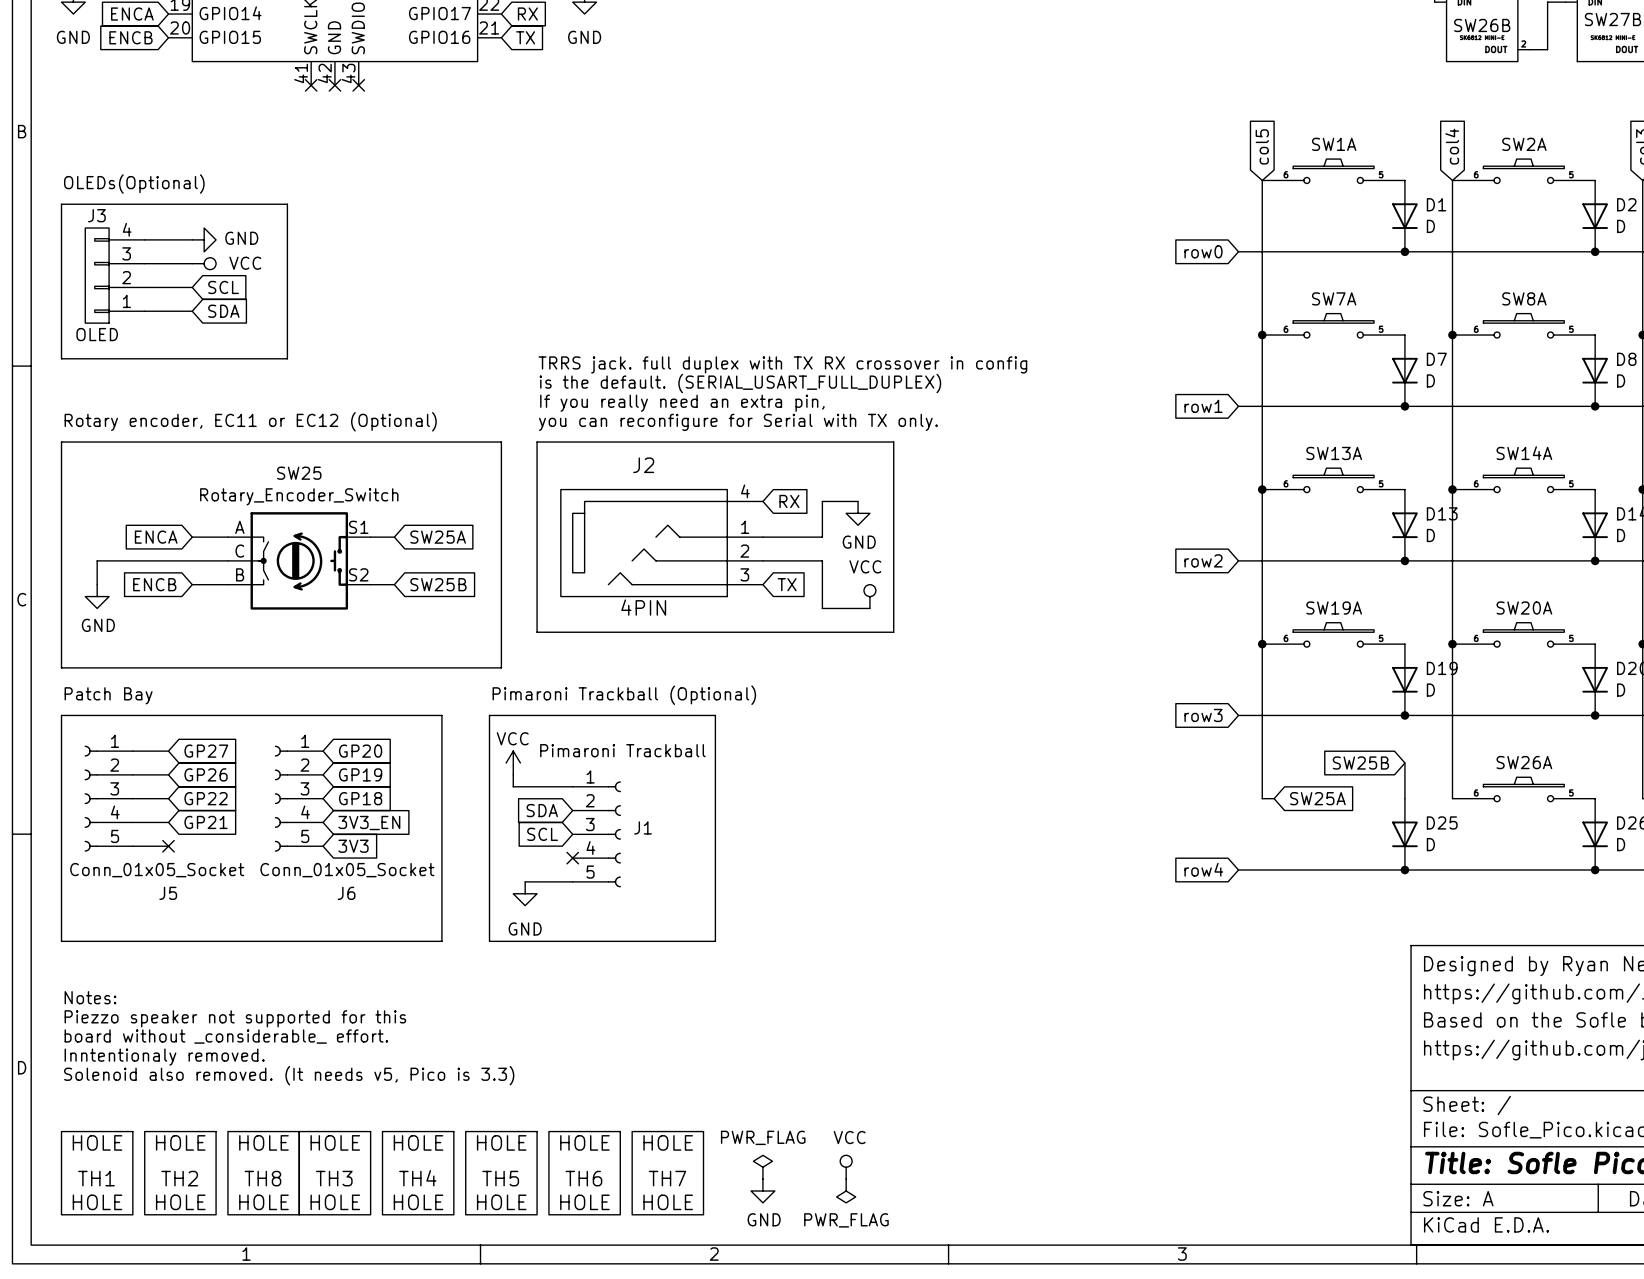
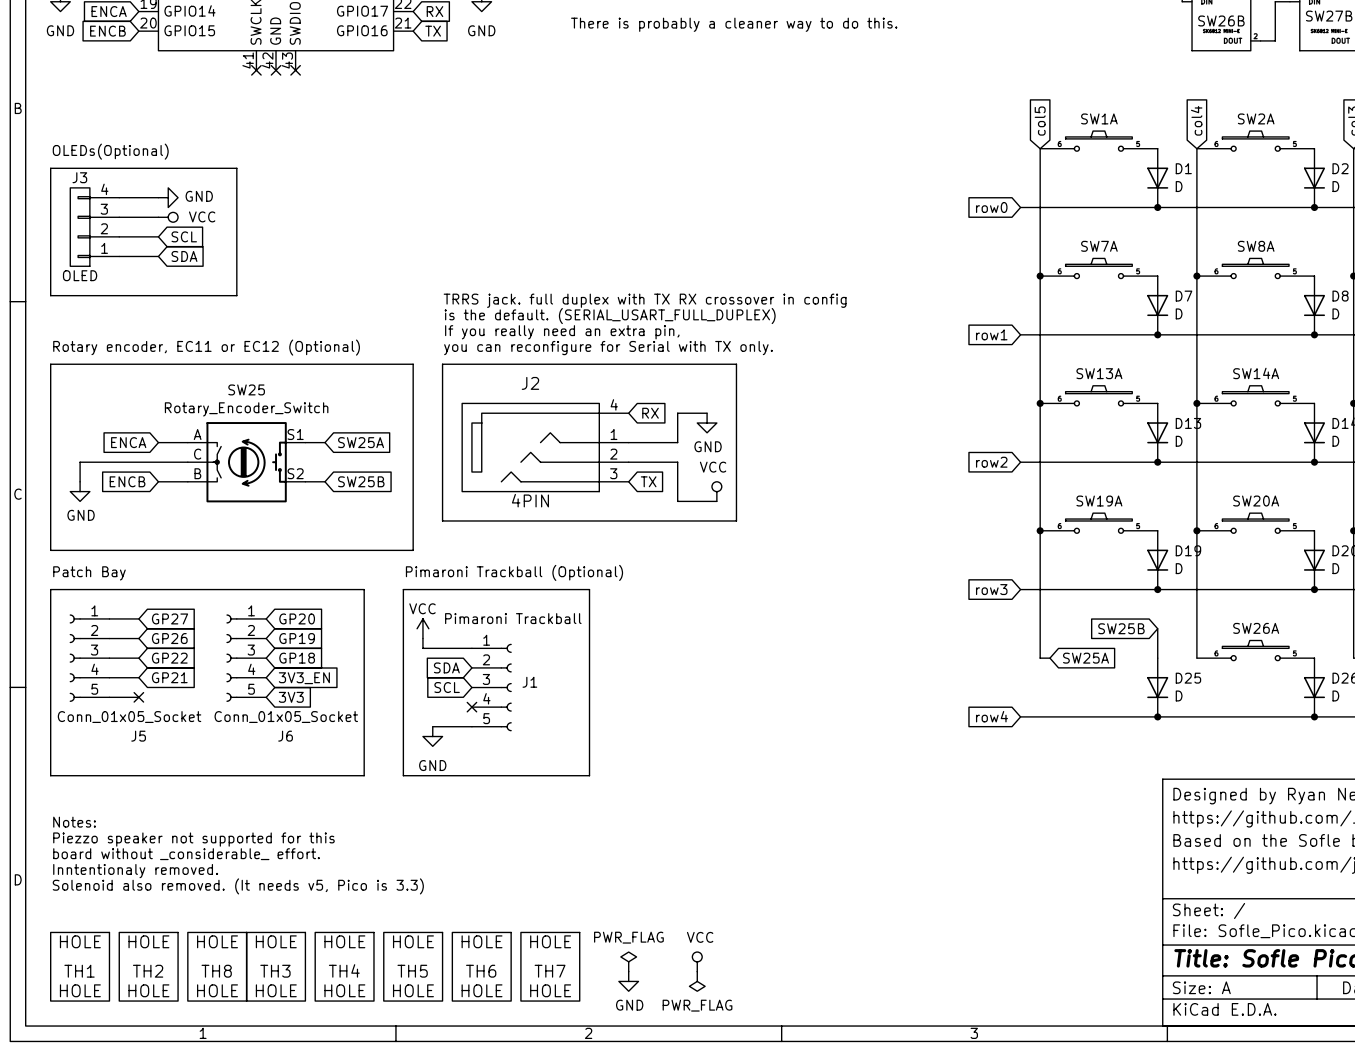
text: none -> There is probably a cleaner way to do this. (734, 24)

